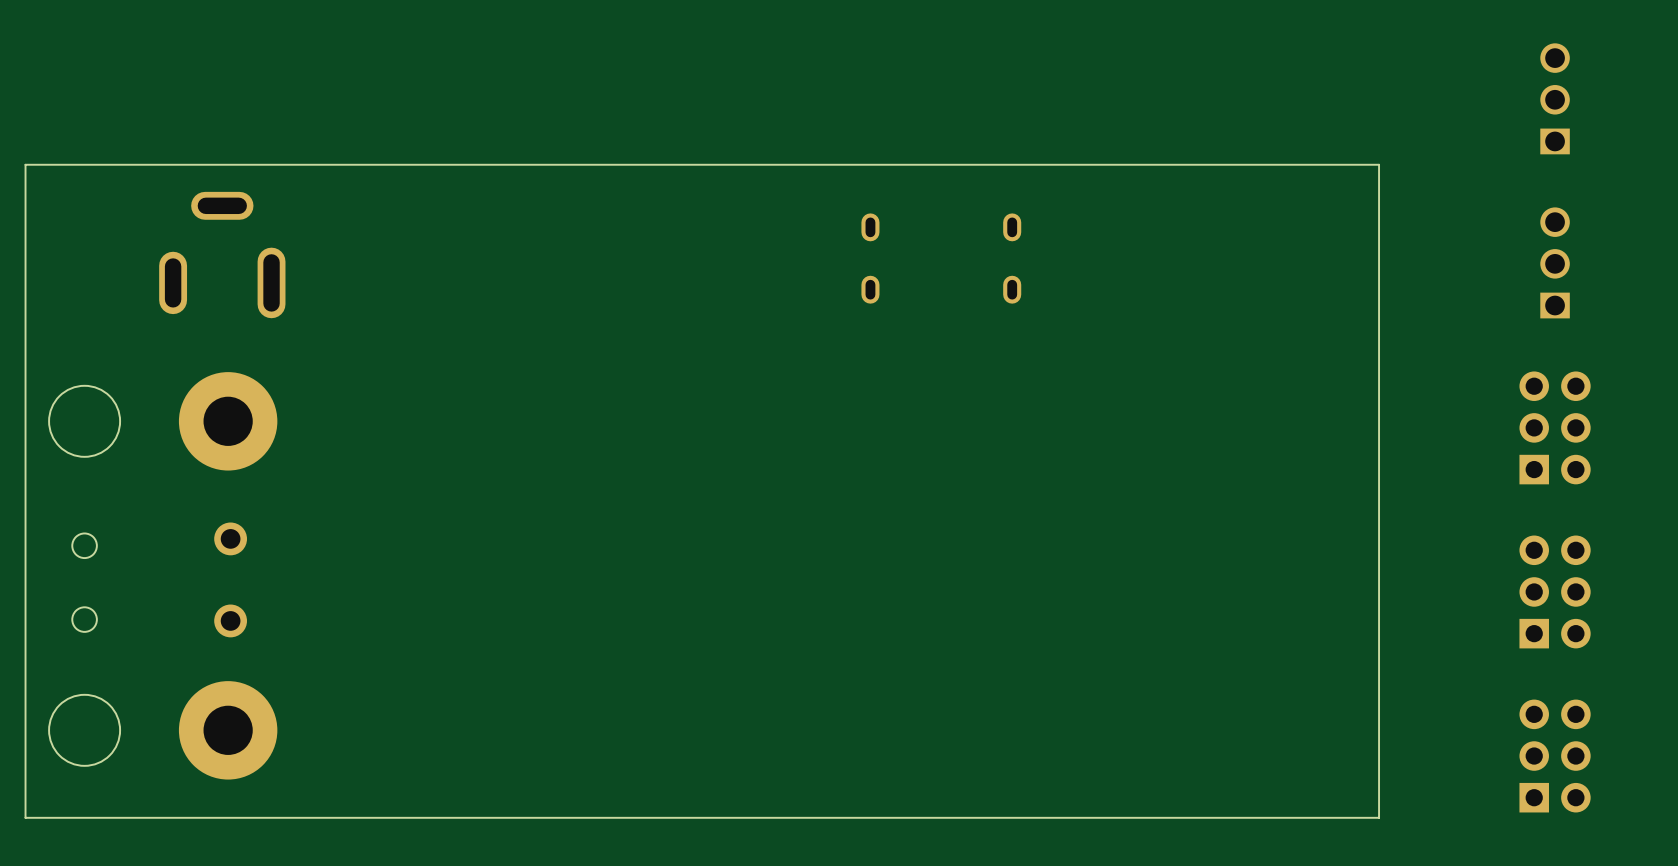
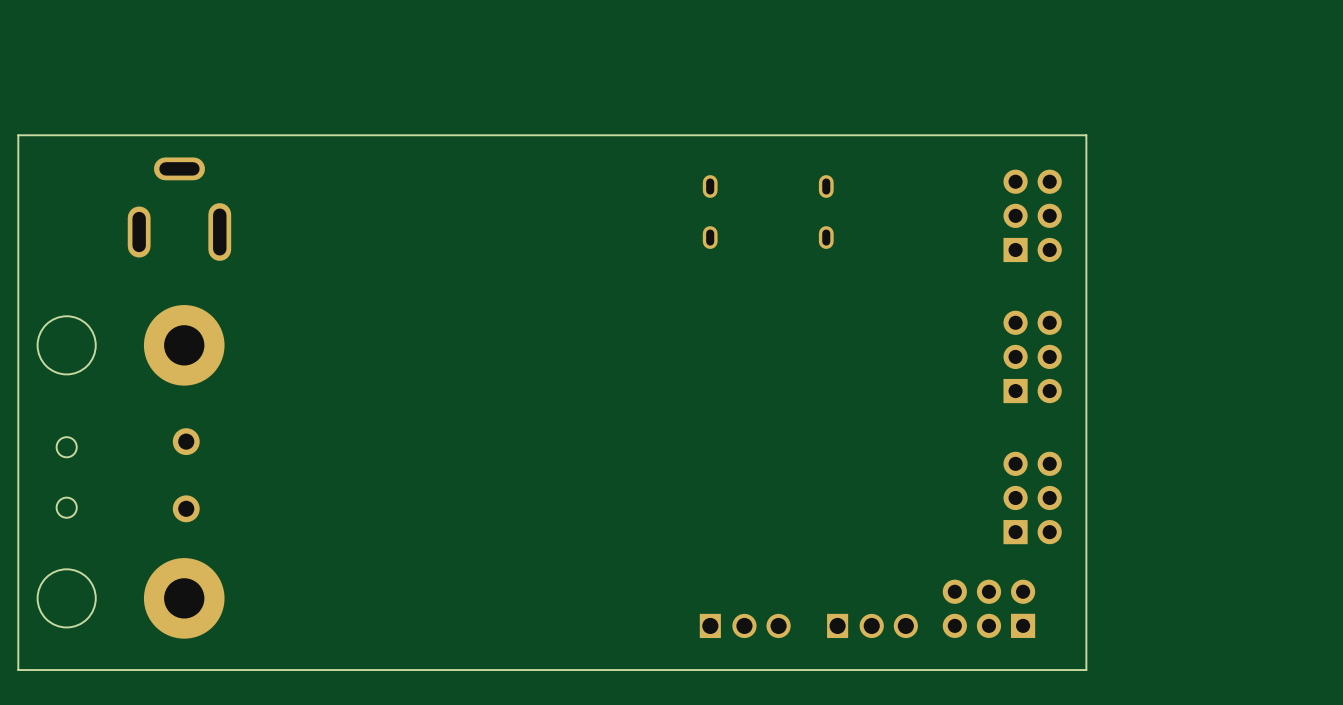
part: (1555, 98) -> none
board edge: (25, 164) (1379, 164) (1379, 817) (1329, 817) -> (18, 135) (1086, 135) (1086, 670)
part: (1555, 262) -> none
part: none -> (1032, 215)
part: (1555, 427) -> none
part: none -> (1032, 356)
part: (1555, 591) -> none
part: none -> (1032, 497)
part: none -> (988, 608)
part: (1555, 756) -> none
part: none -> (745, 625)
part: none -> (872, 625)

